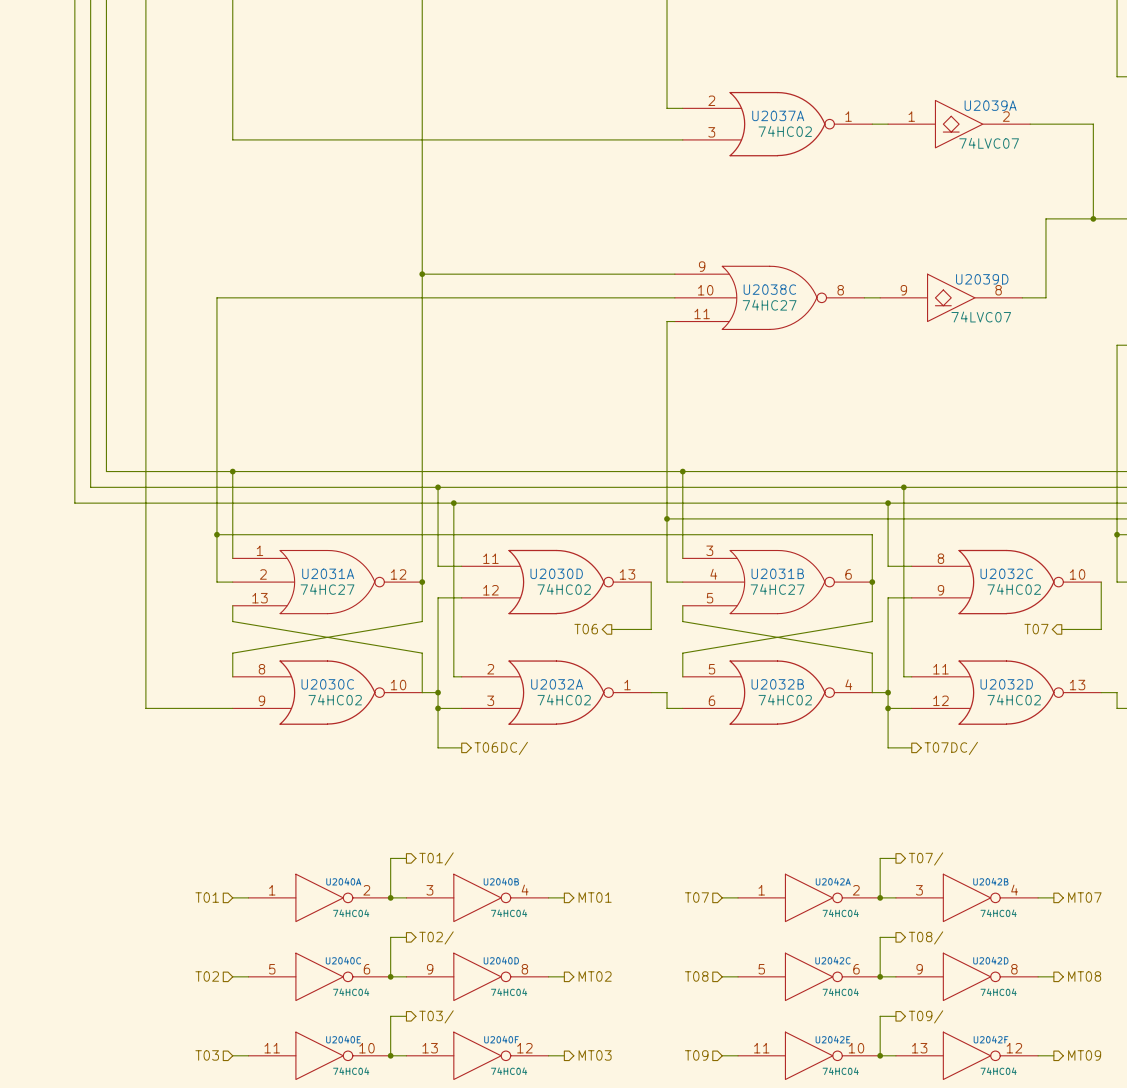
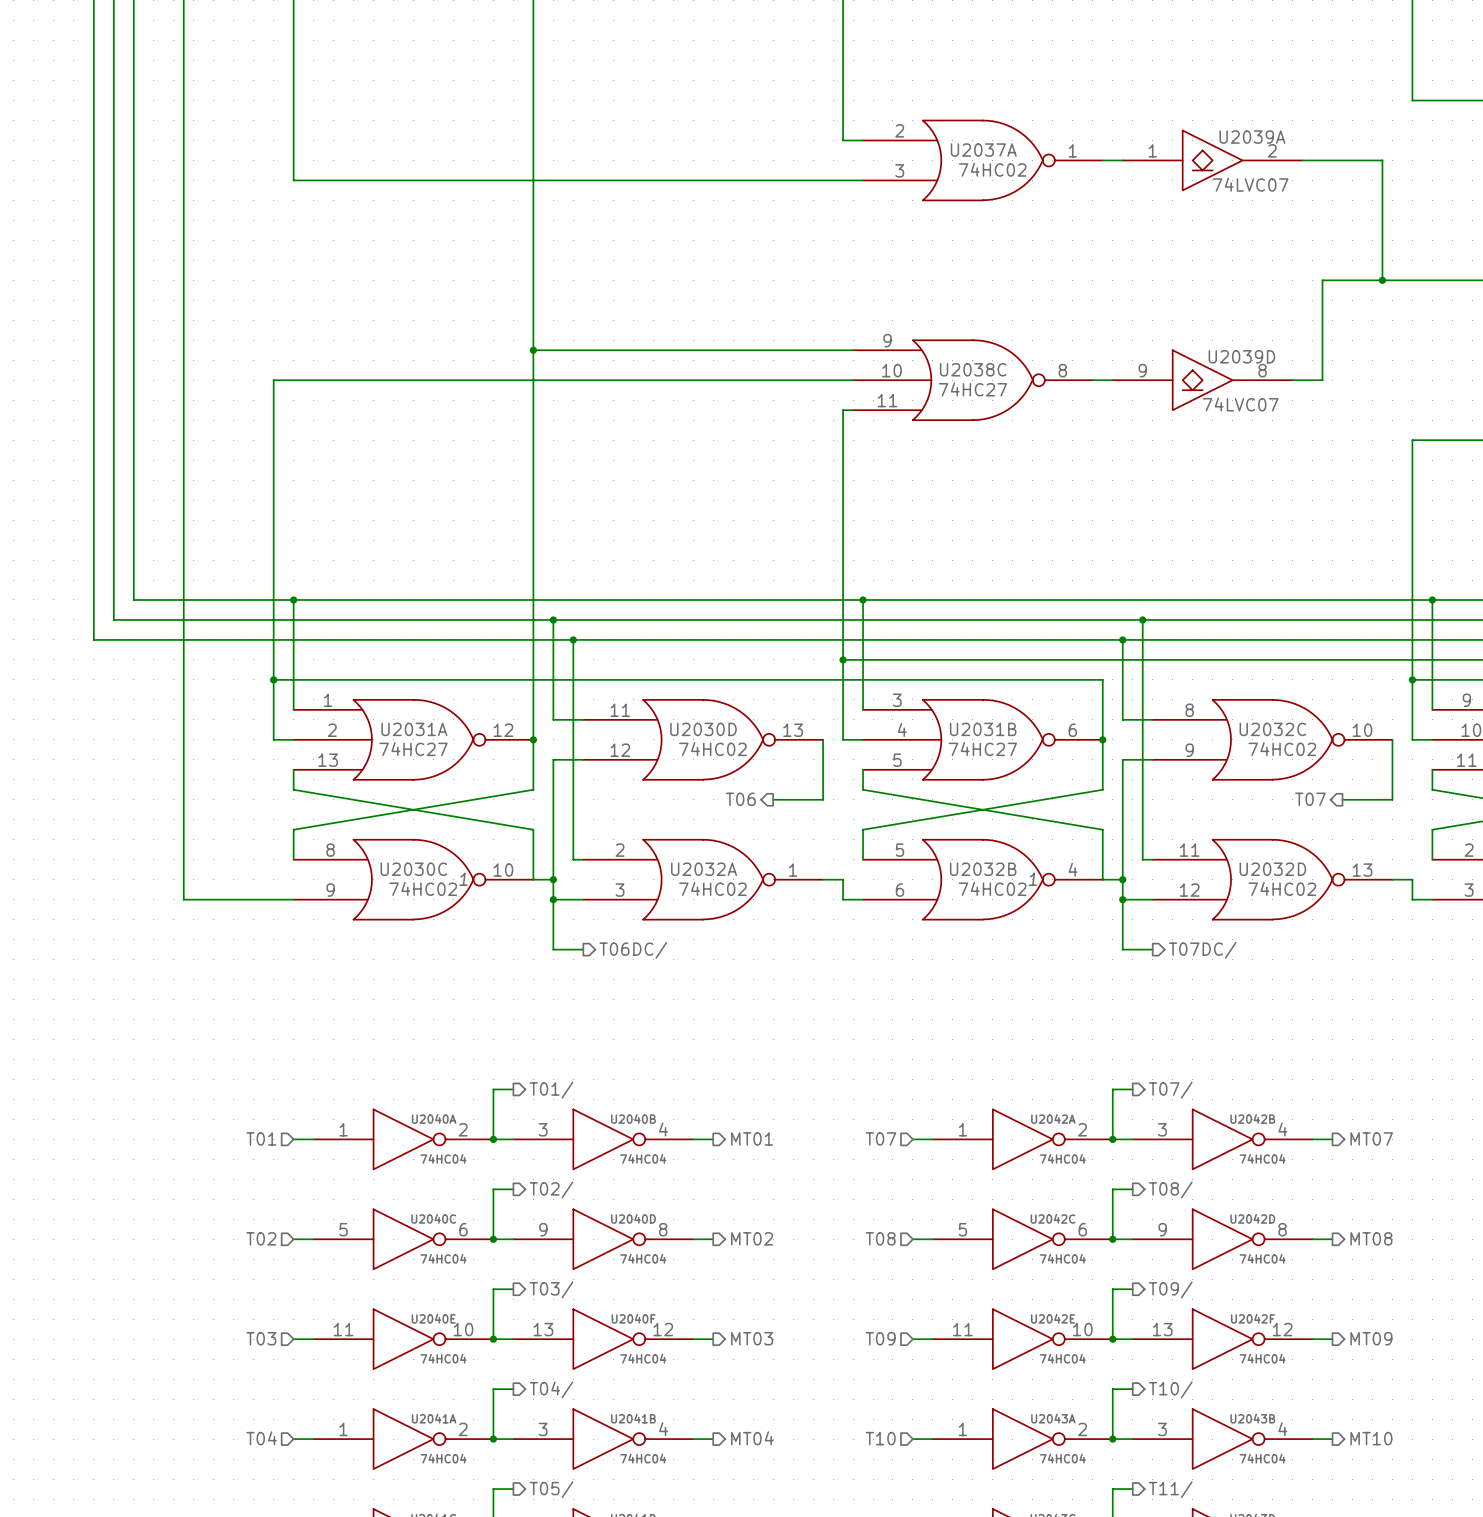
U2030C text: none -> 1 (463, 879)
U2032B text: none -> 1 (1032, 879)

